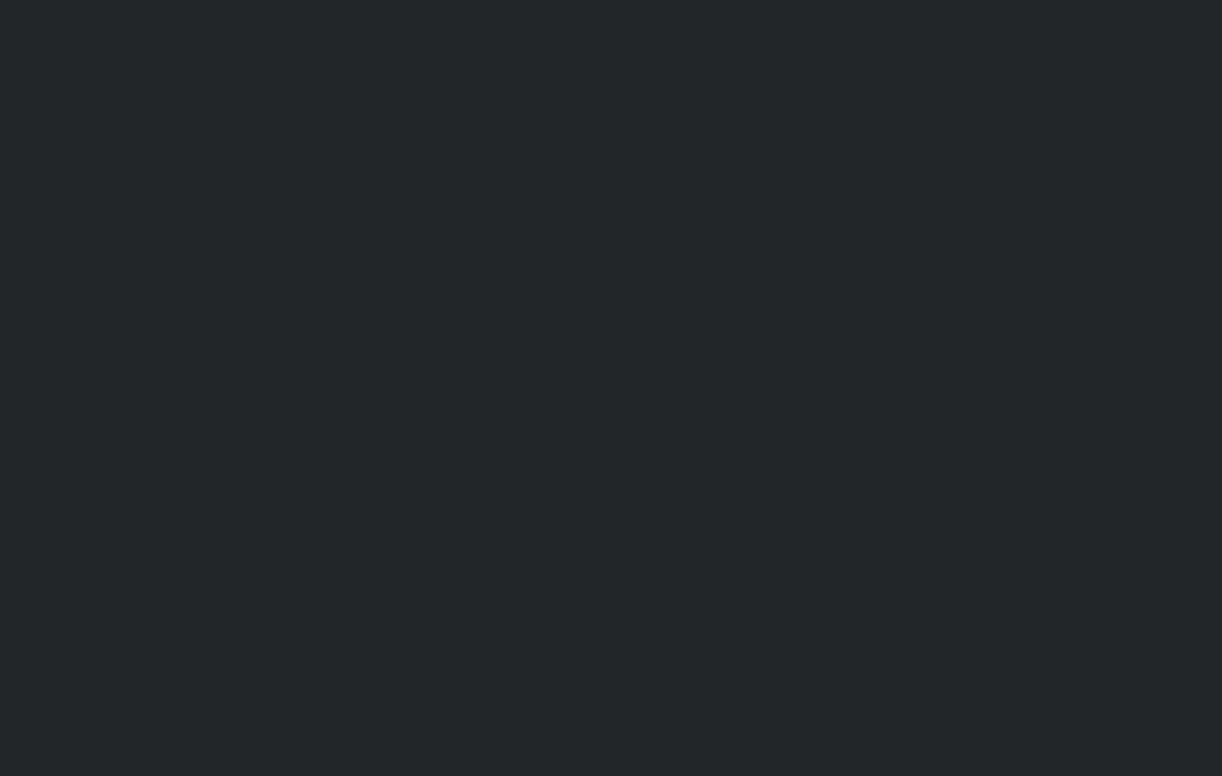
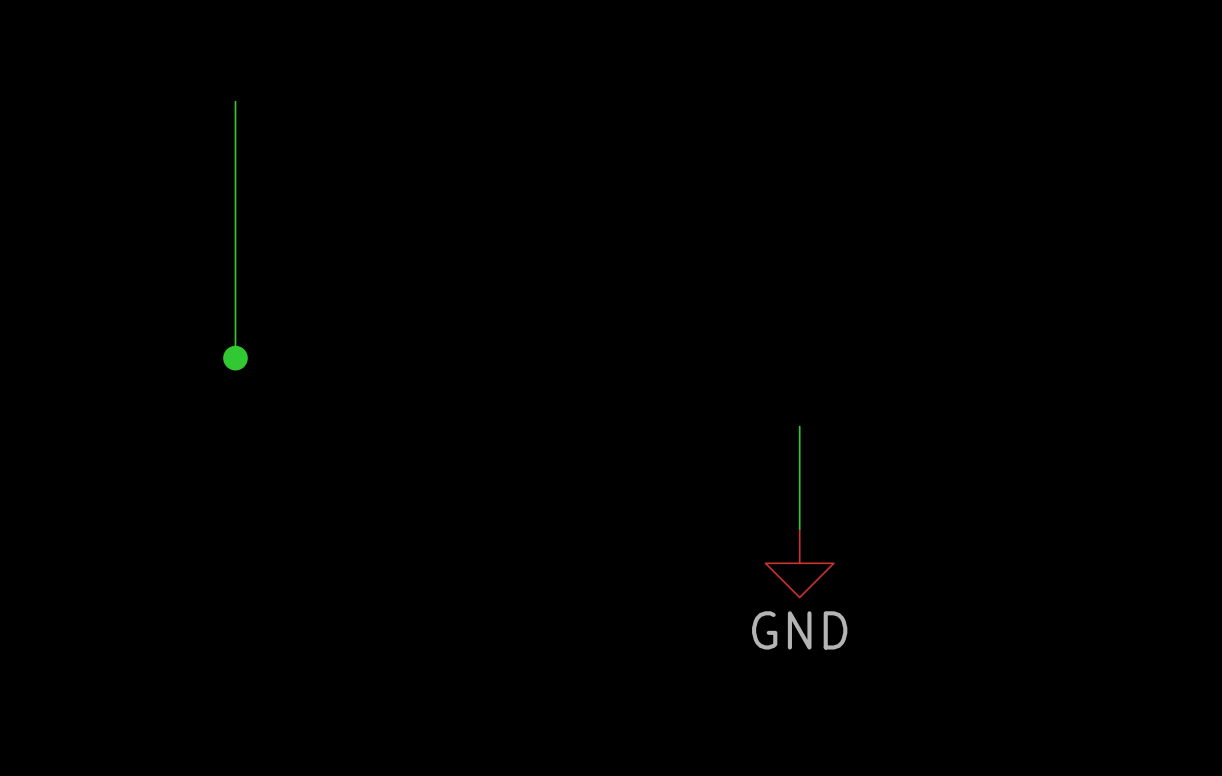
wire: none -> (235, 101) (235, 358)
junction: none -> (235, 358)
wire: none -> (799, 426) (799, 529)
power symbol: none -> GND (799, 563)

